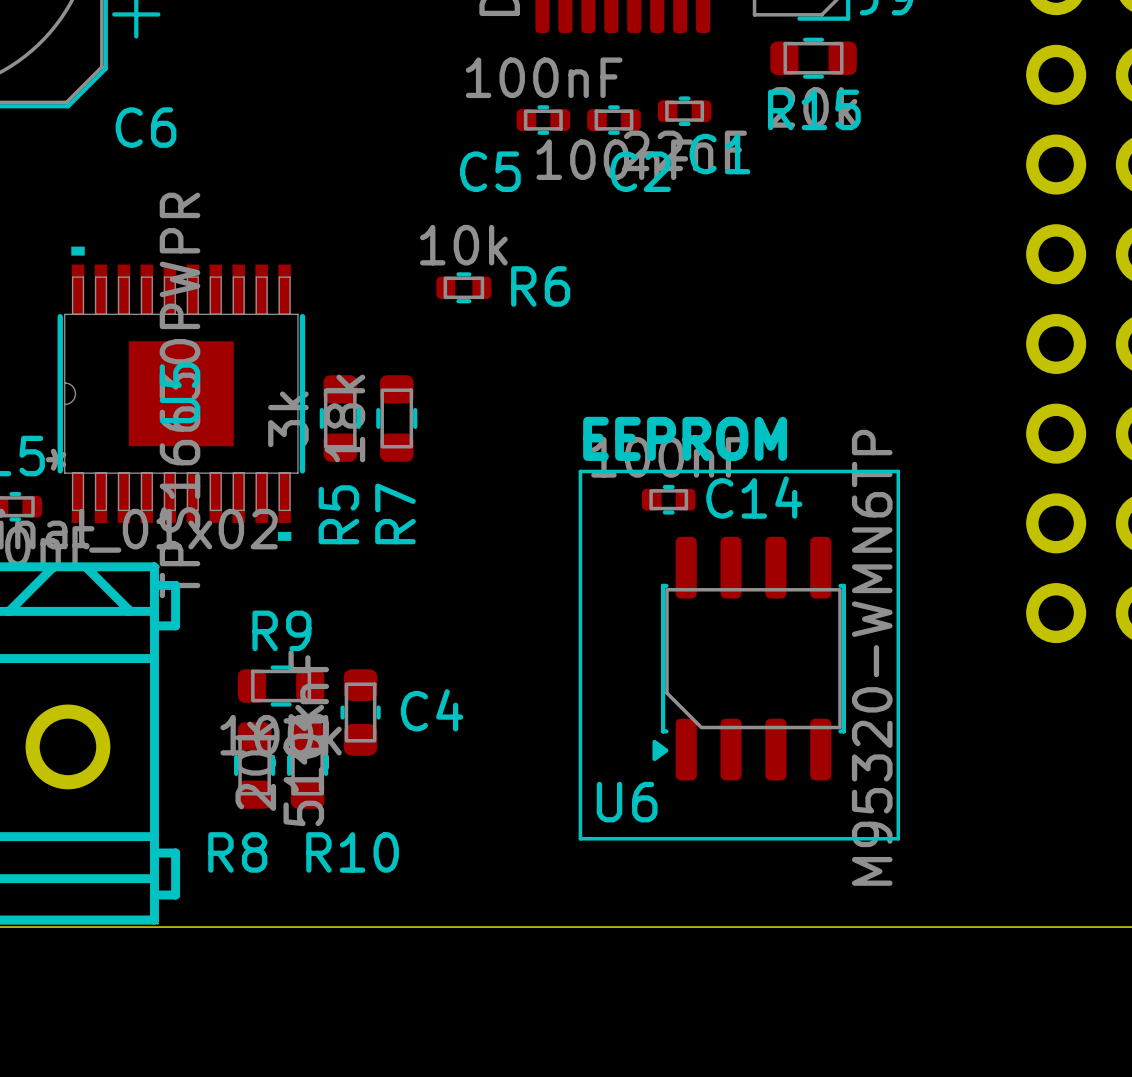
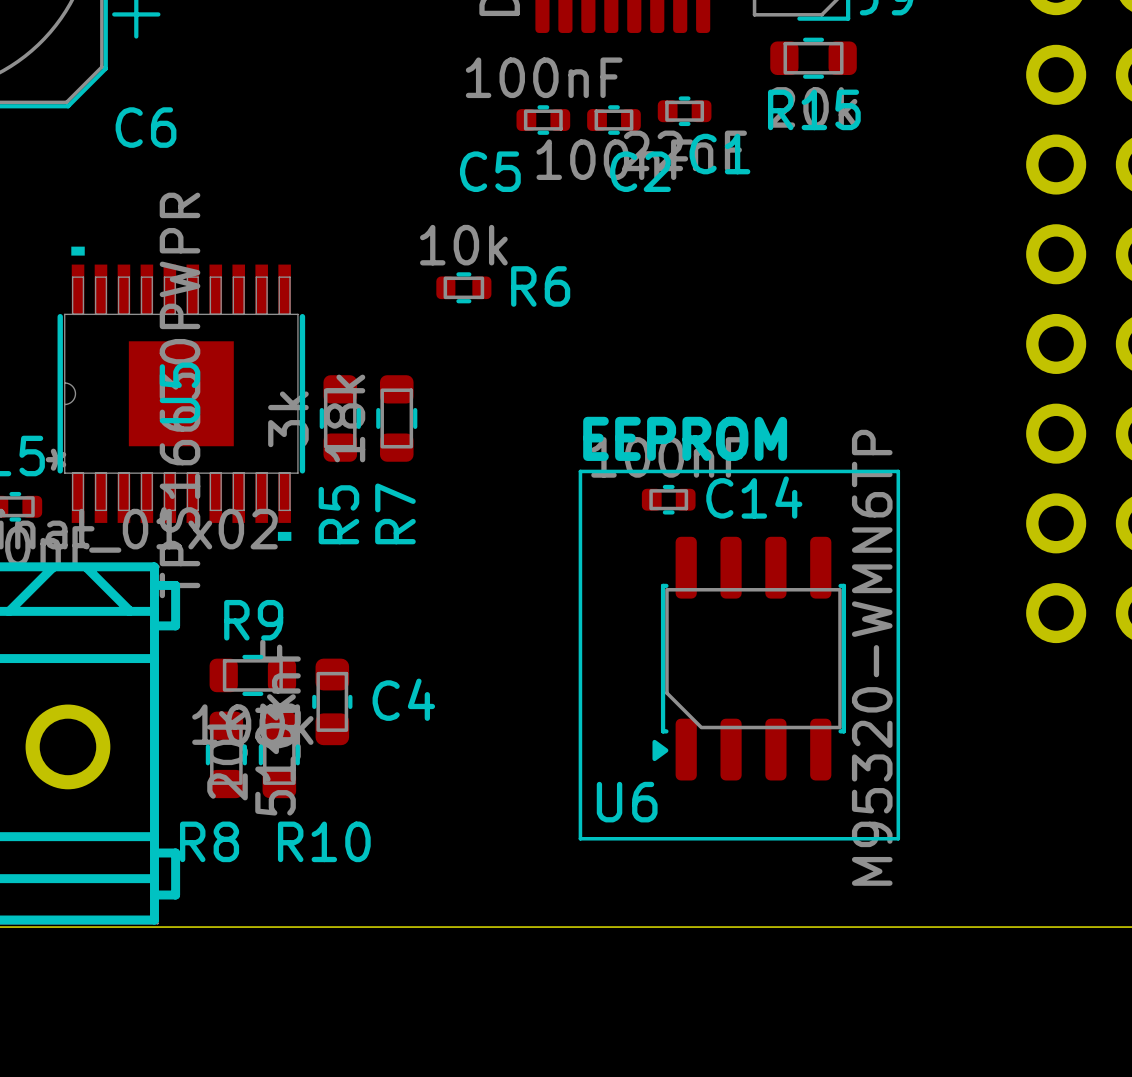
R9 position: (281, 686) -> (252, 675)
C4 position: (360, 712) -> (332, 701)
R8 position: (254, 765) -> (226, 754)
R10 position: (307, 765) -> (279, 754)

